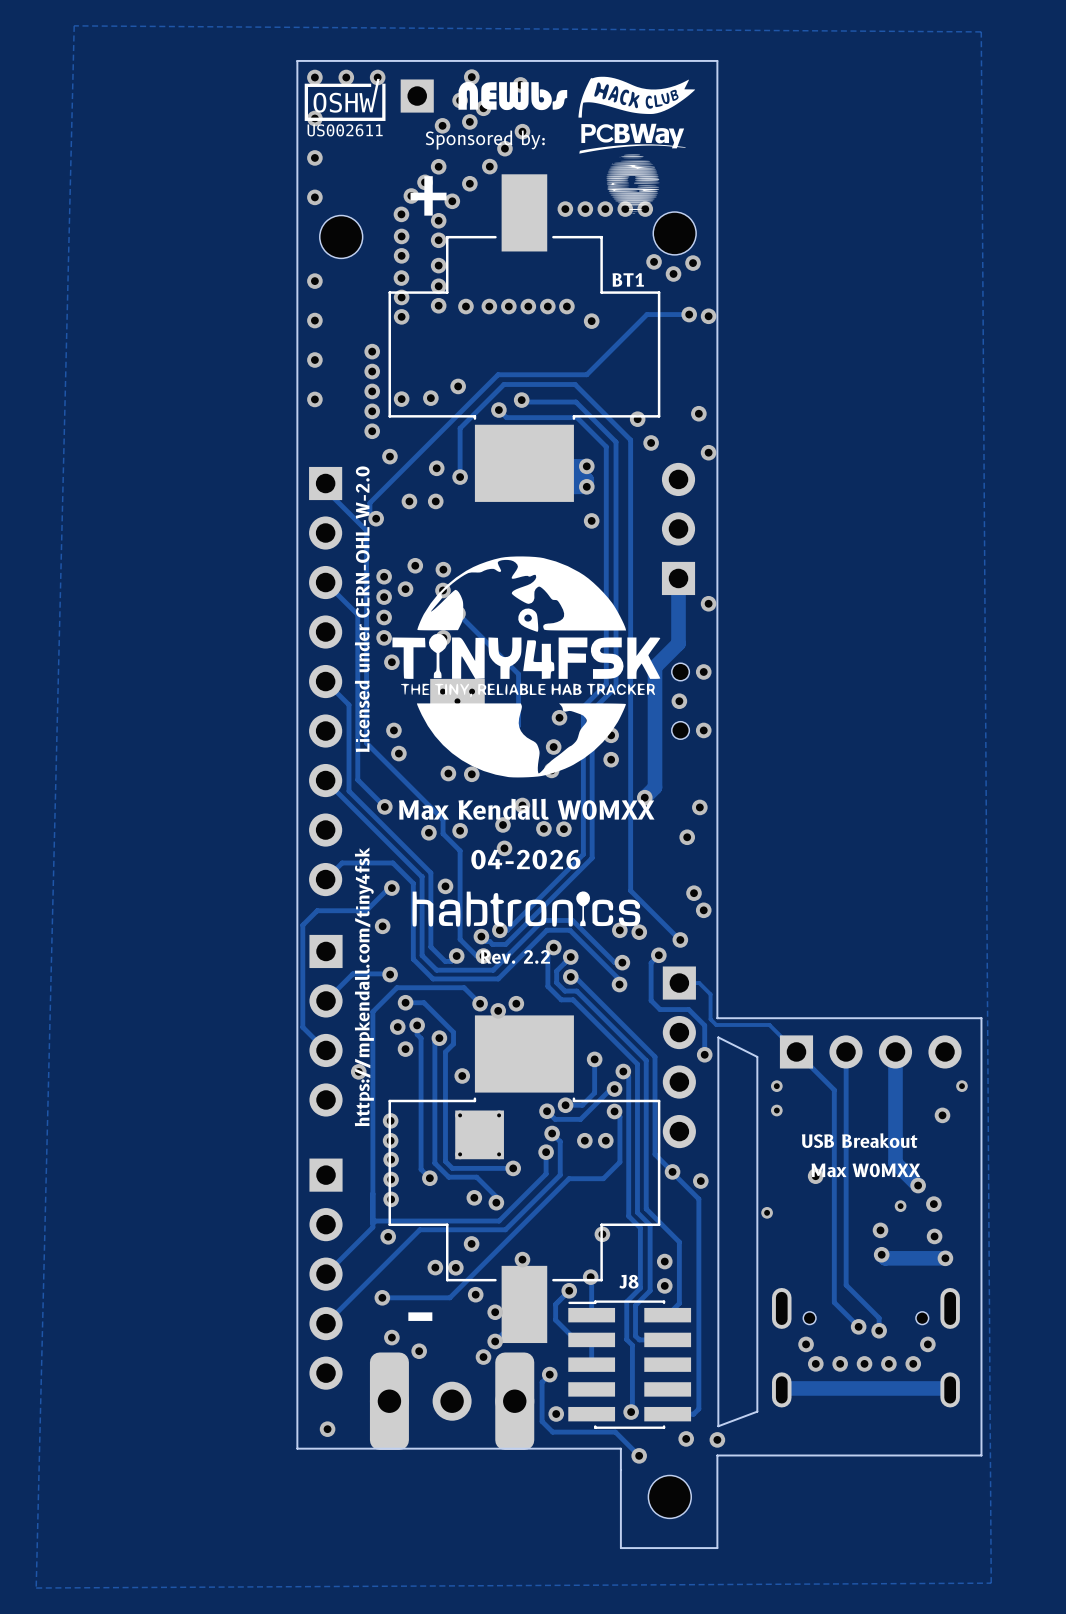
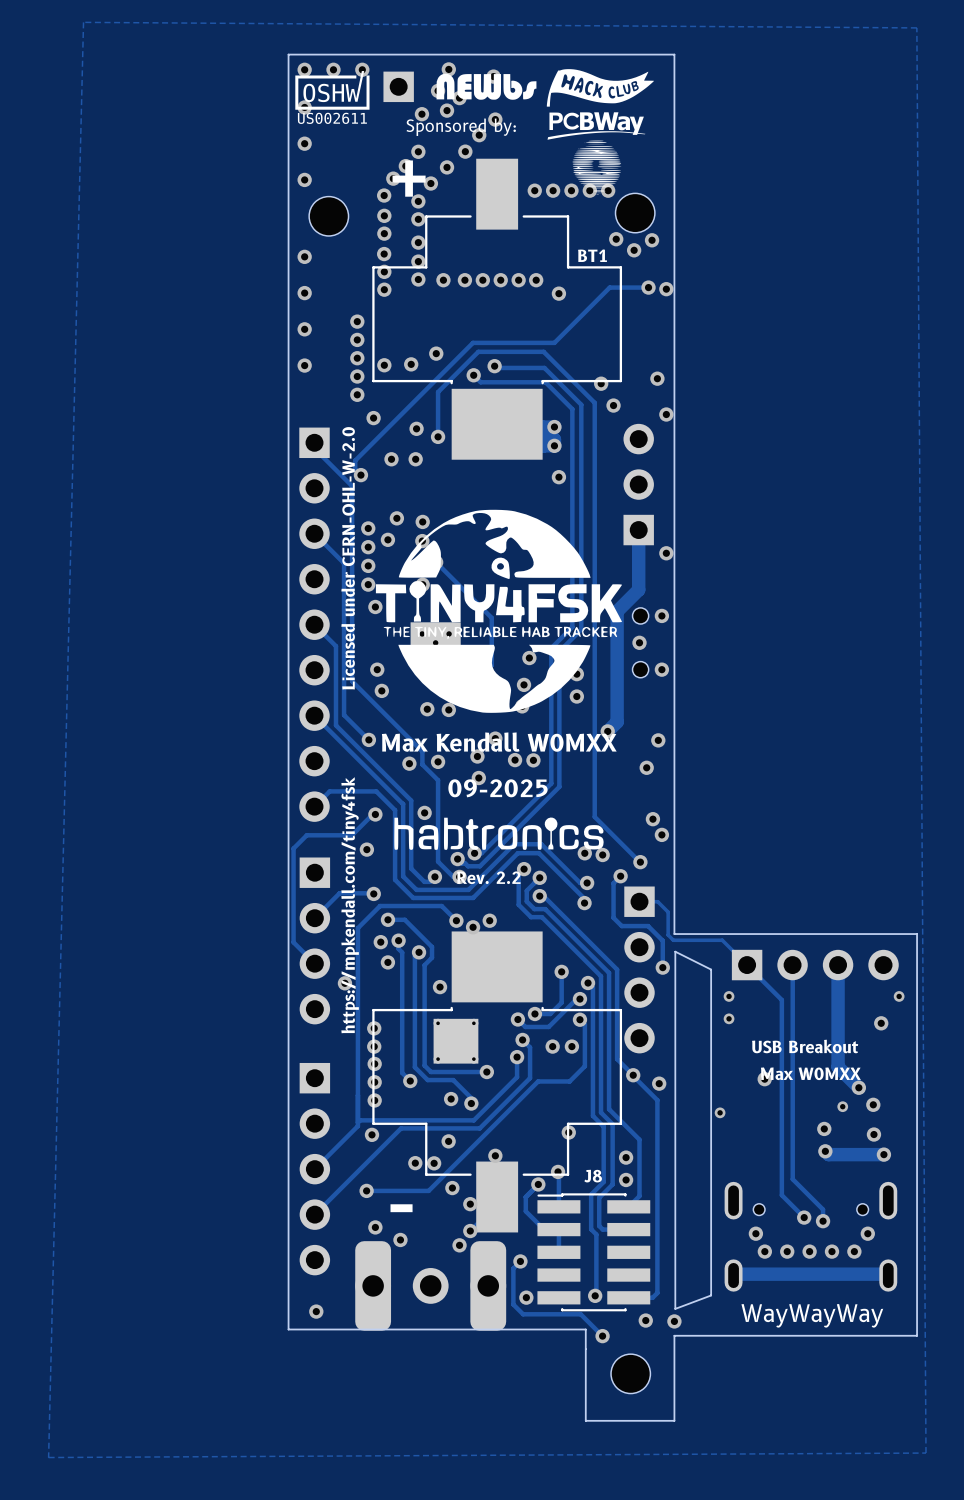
text: 04-2026 (525, 859) -> 09-2025 (497, 788)
text: none -> WayWayWay (812, 1315)

